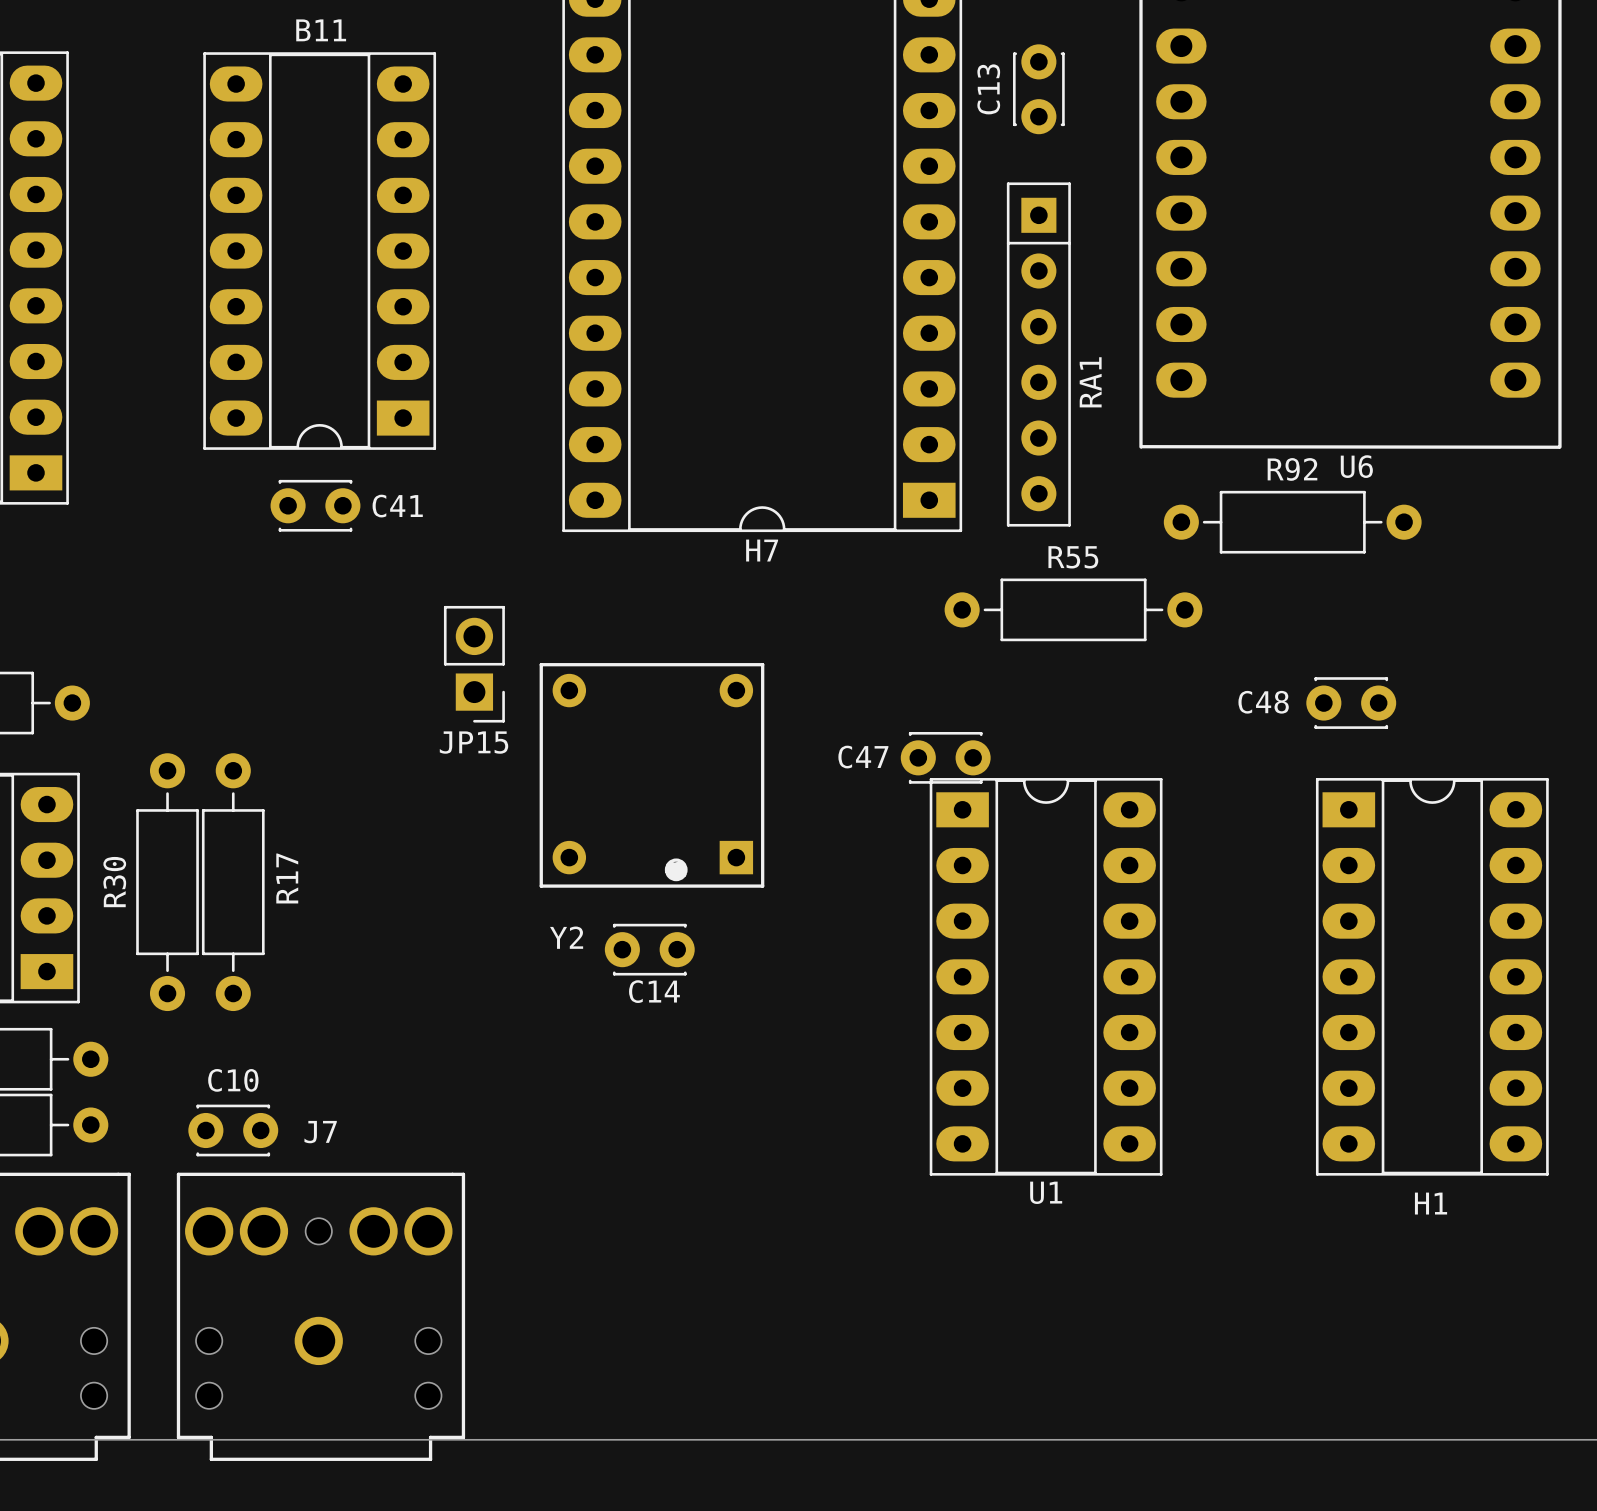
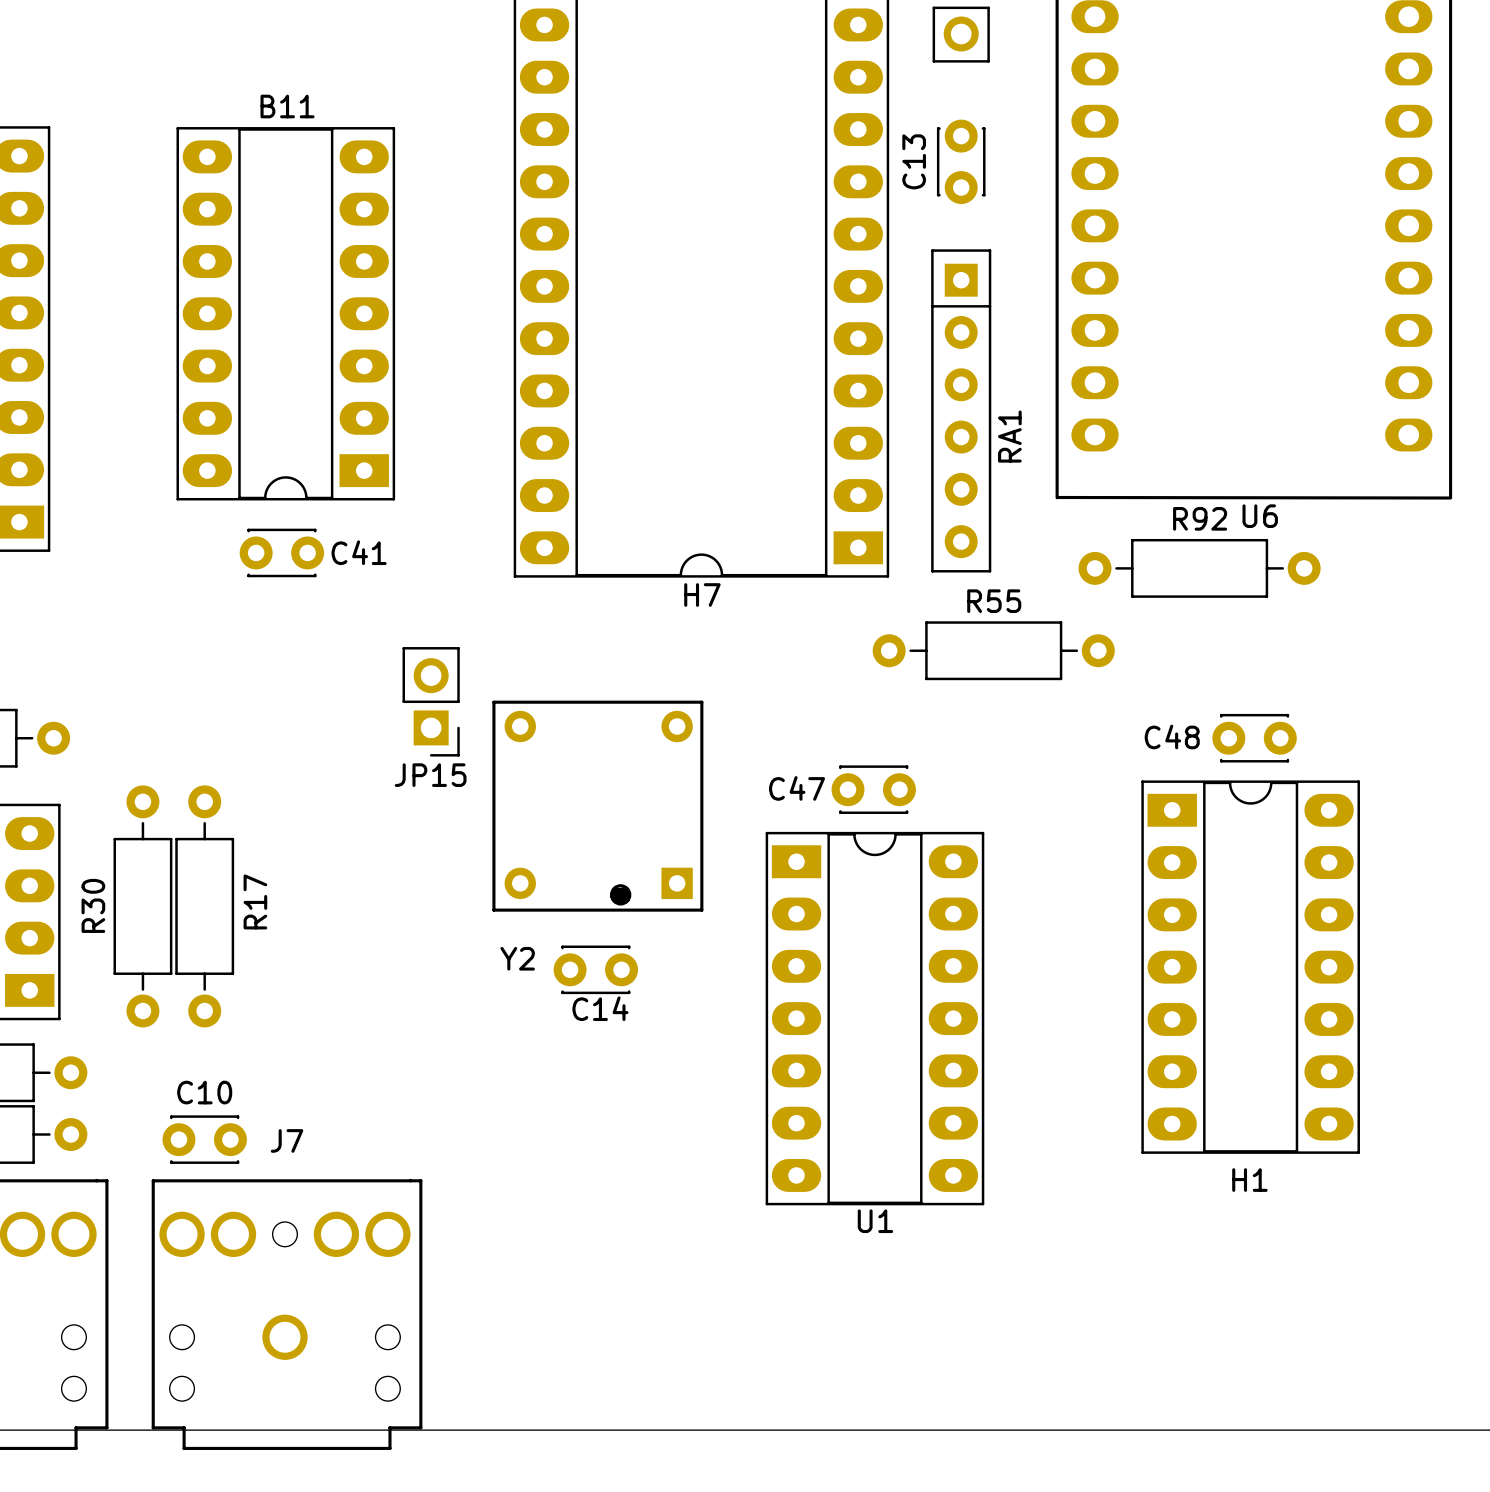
U1 position: (1046, 976) -> (874, 1018)
H1 position: (1432, 976) -> (1250, 967)

